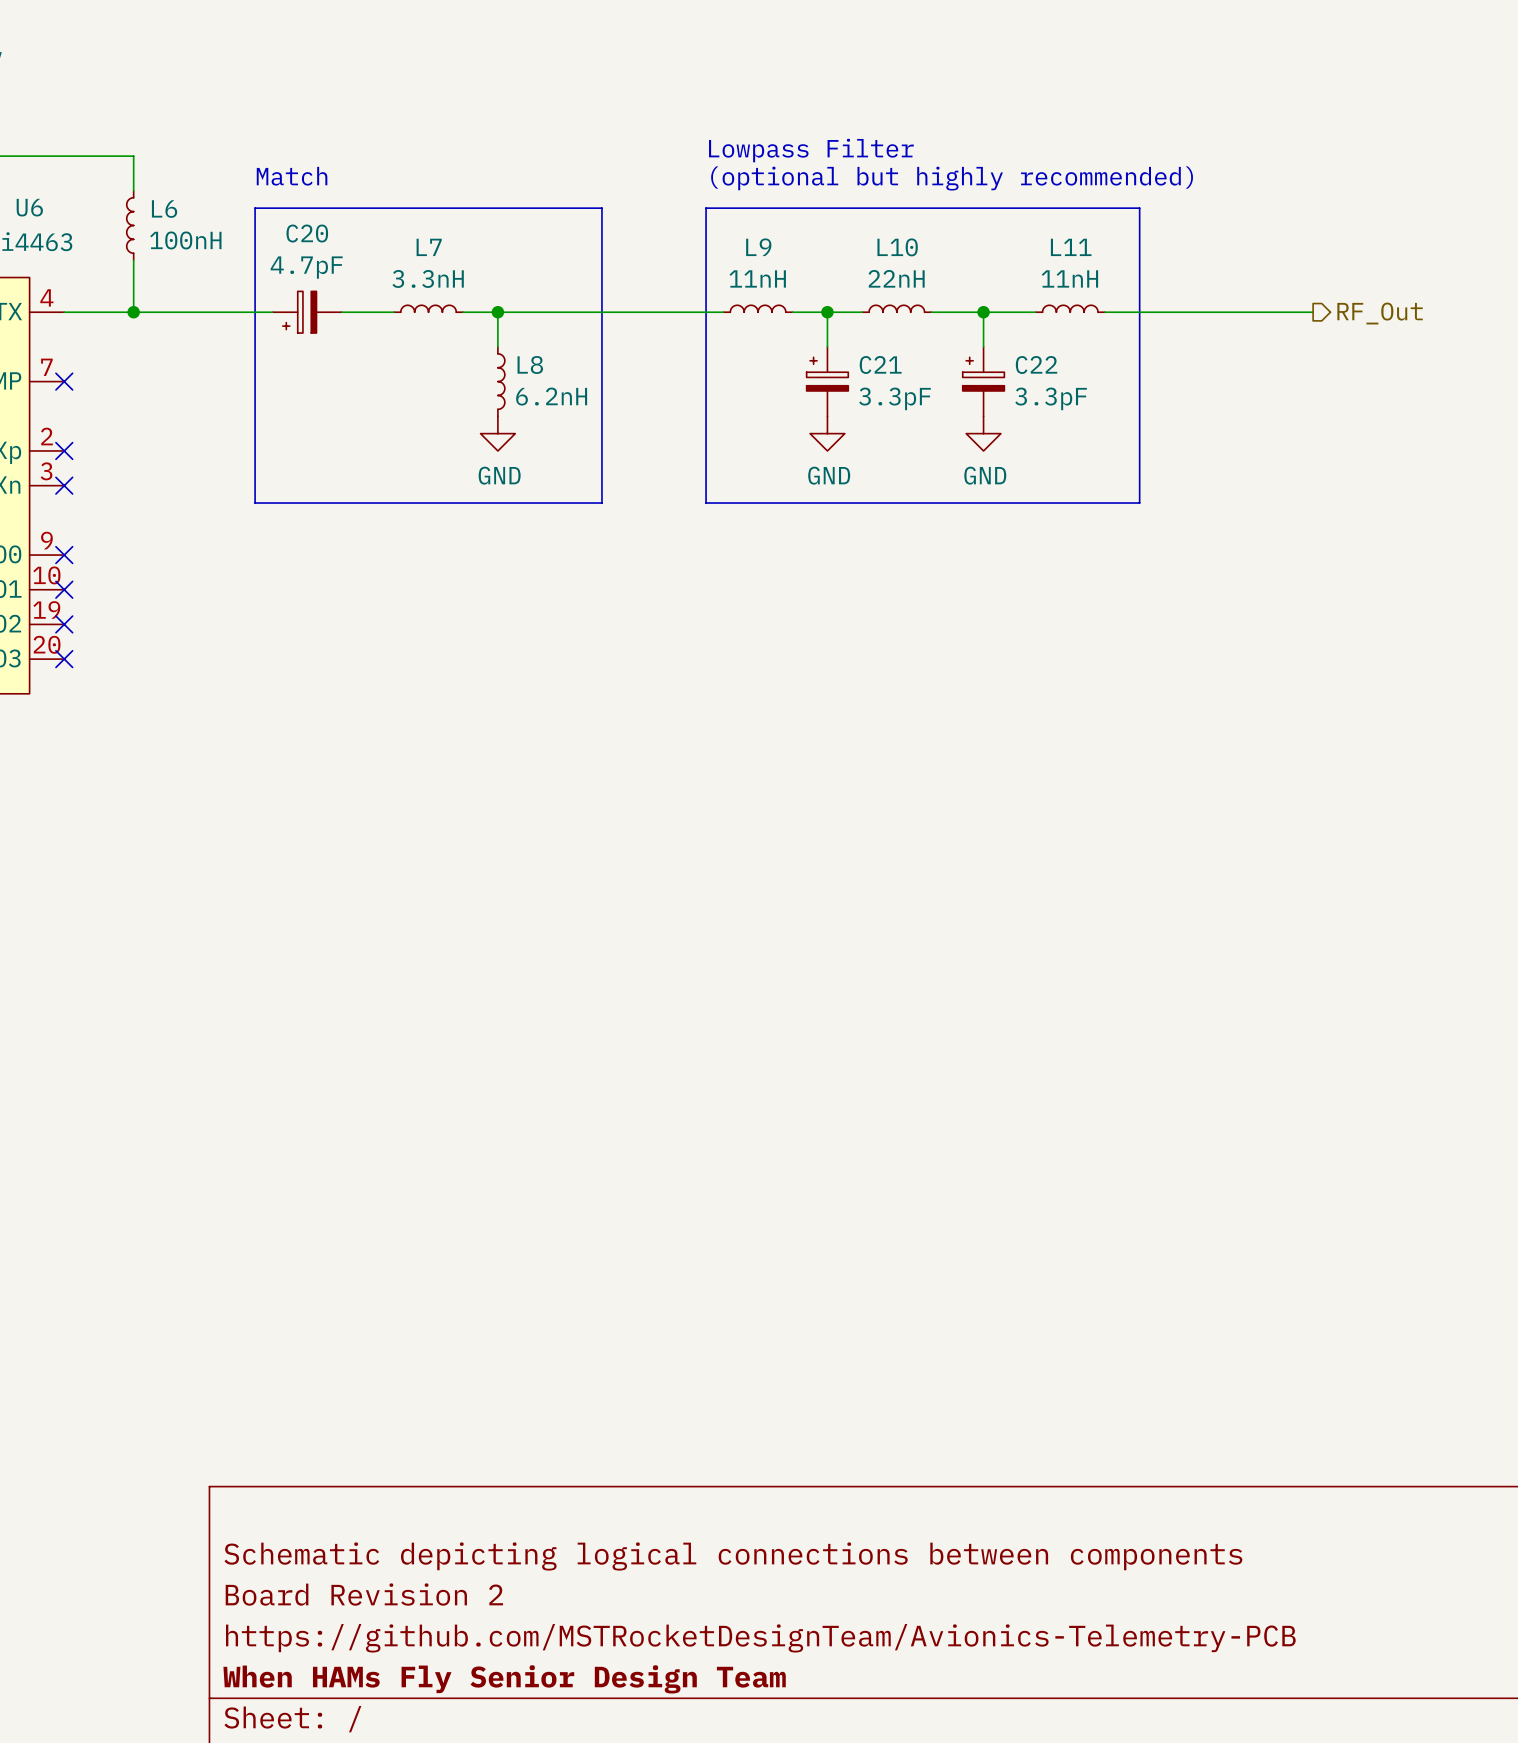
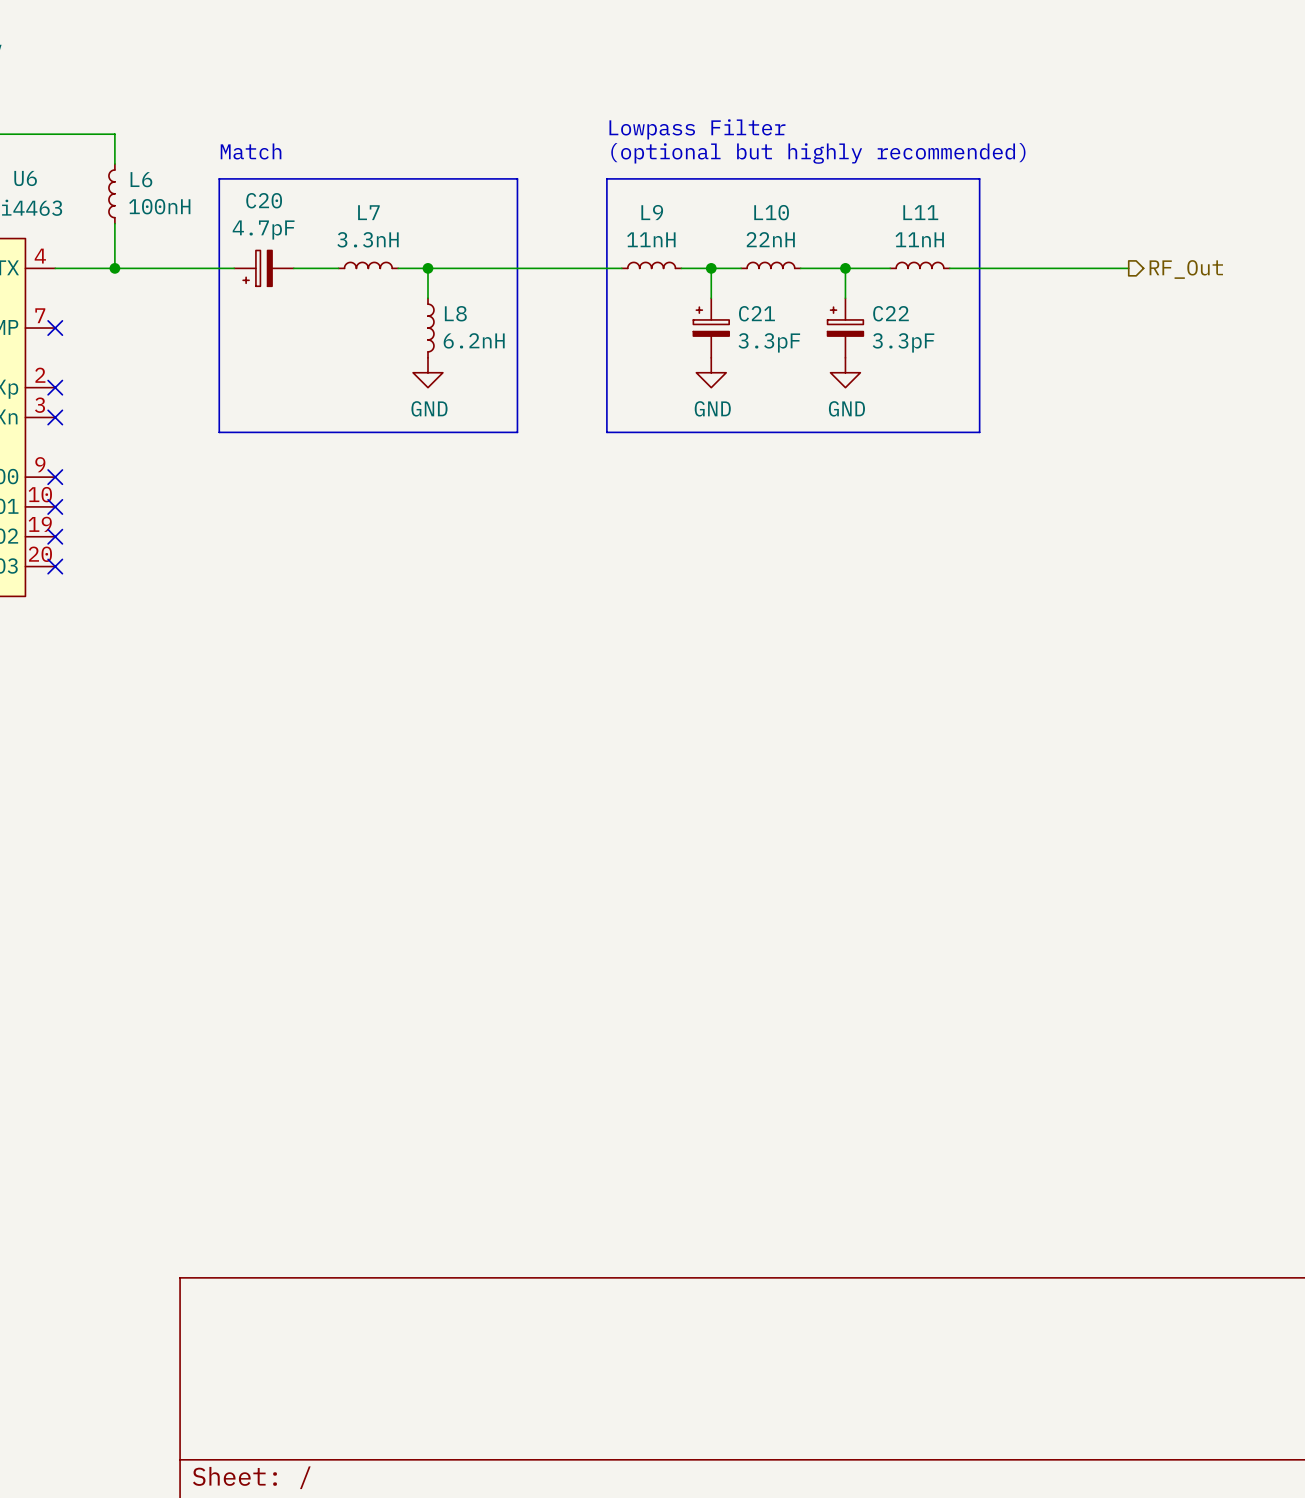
title block: Schematic depicting logical connections between components (733, 1556) -> none
title block: Board Revision 2 (364, 1594) -> none
title block: https://github.com/MSTRocketDesignTeam/Avionics-Telemetry-PCB (760, 1638) -> none
title block: When HAMs Fly Senior Design Team (504, 1679) -> none

